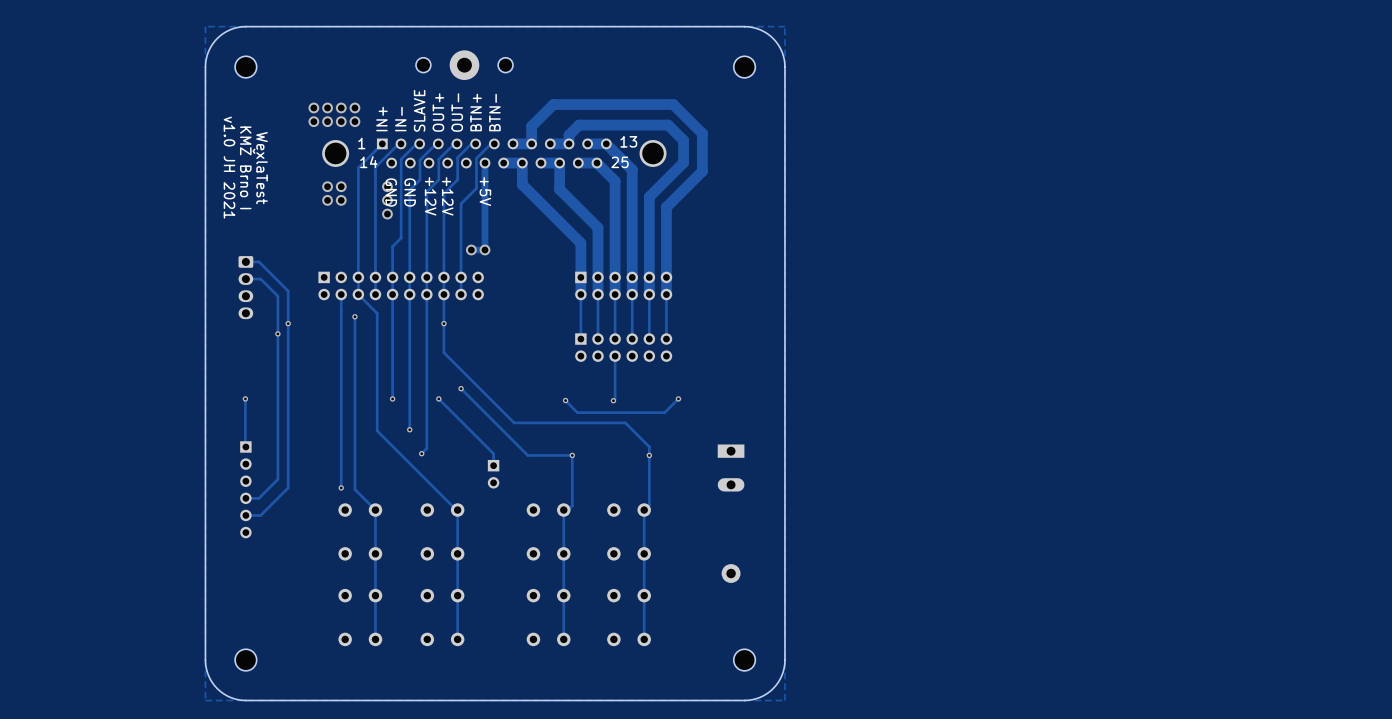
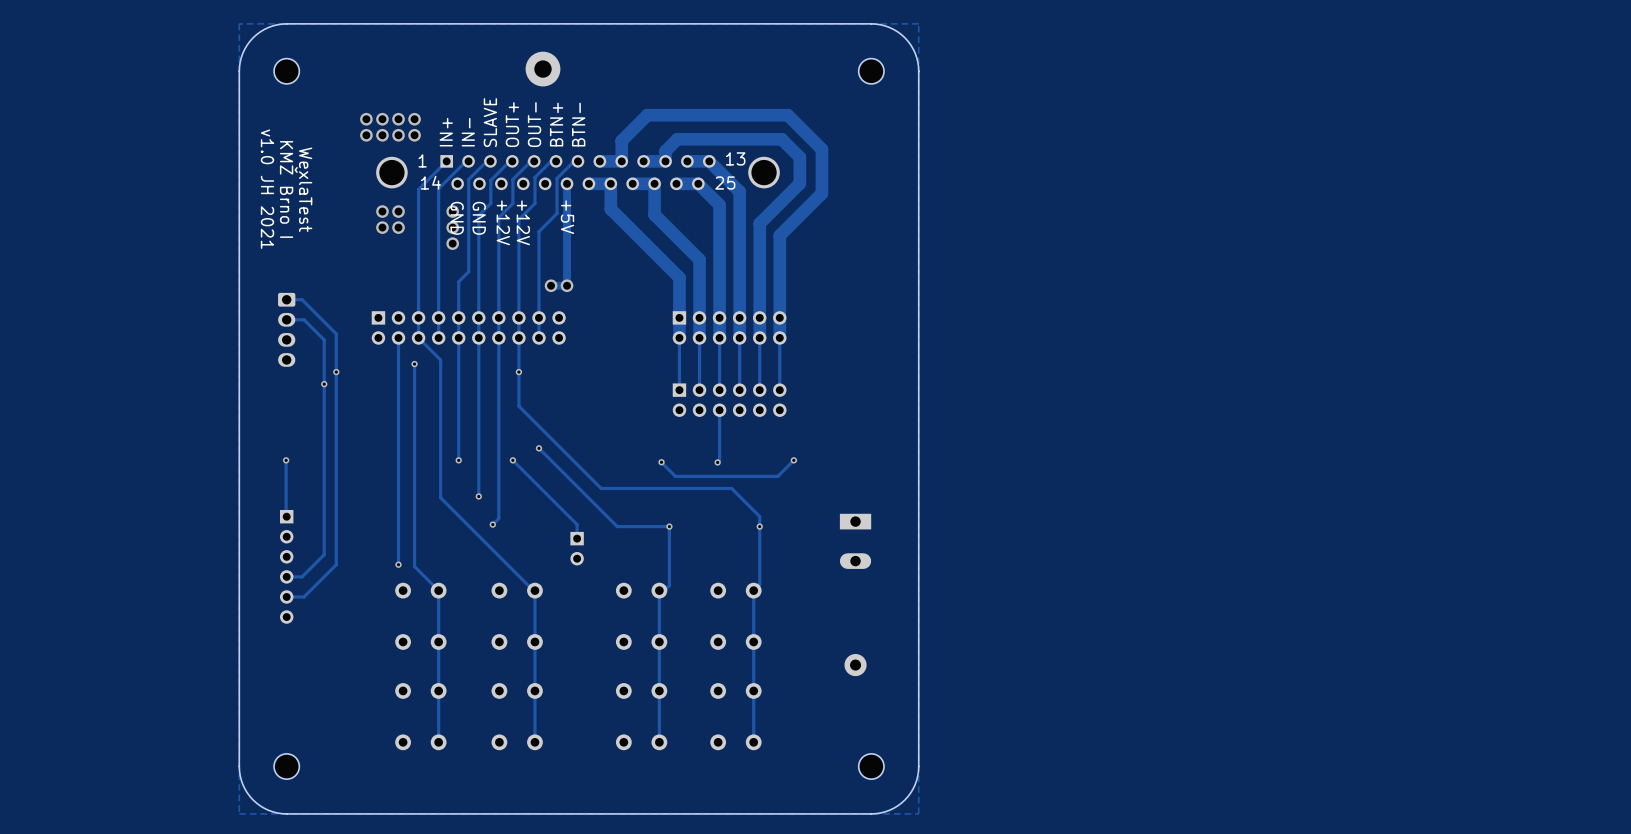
part: (423, 65) -> none
part: (505, 65) -> none

